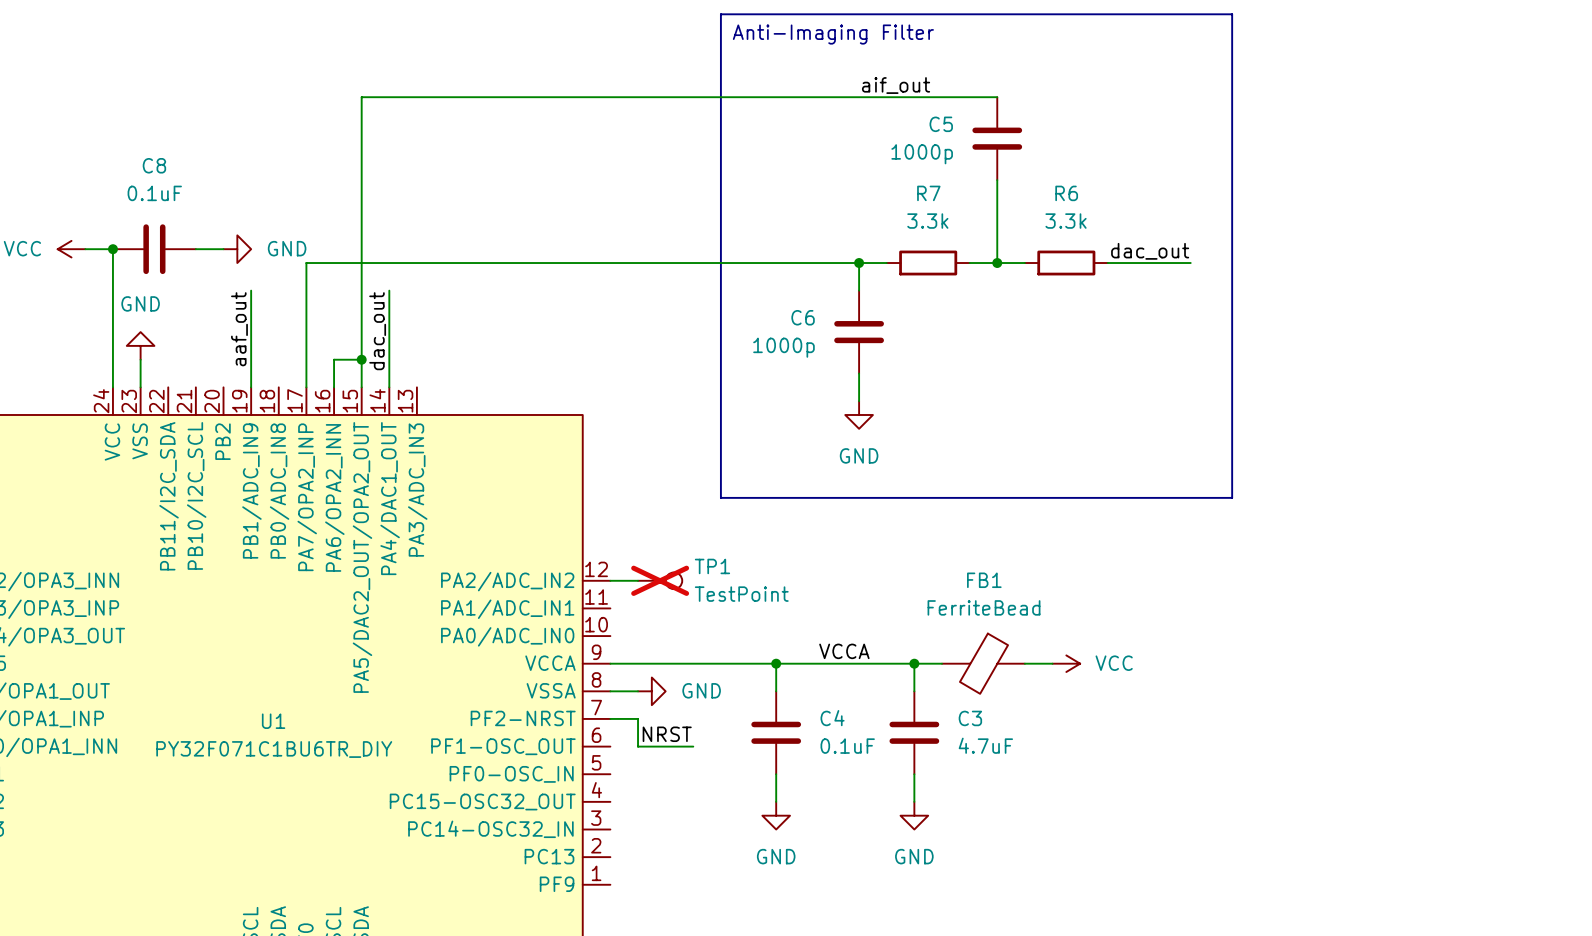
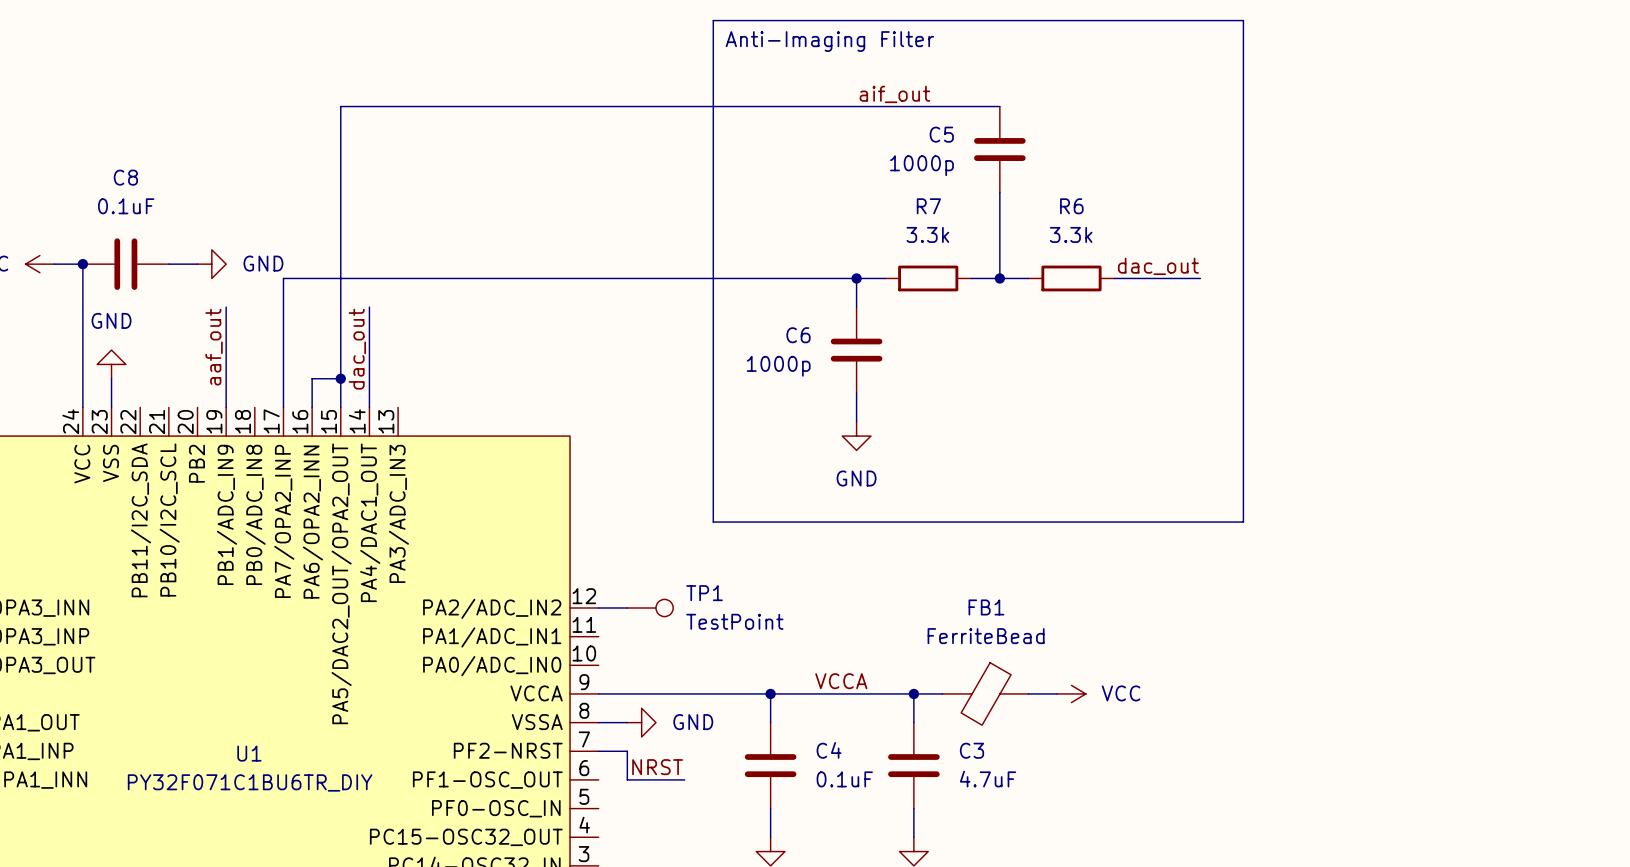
TP1 do-not-place cross: (660, 580) -> none

